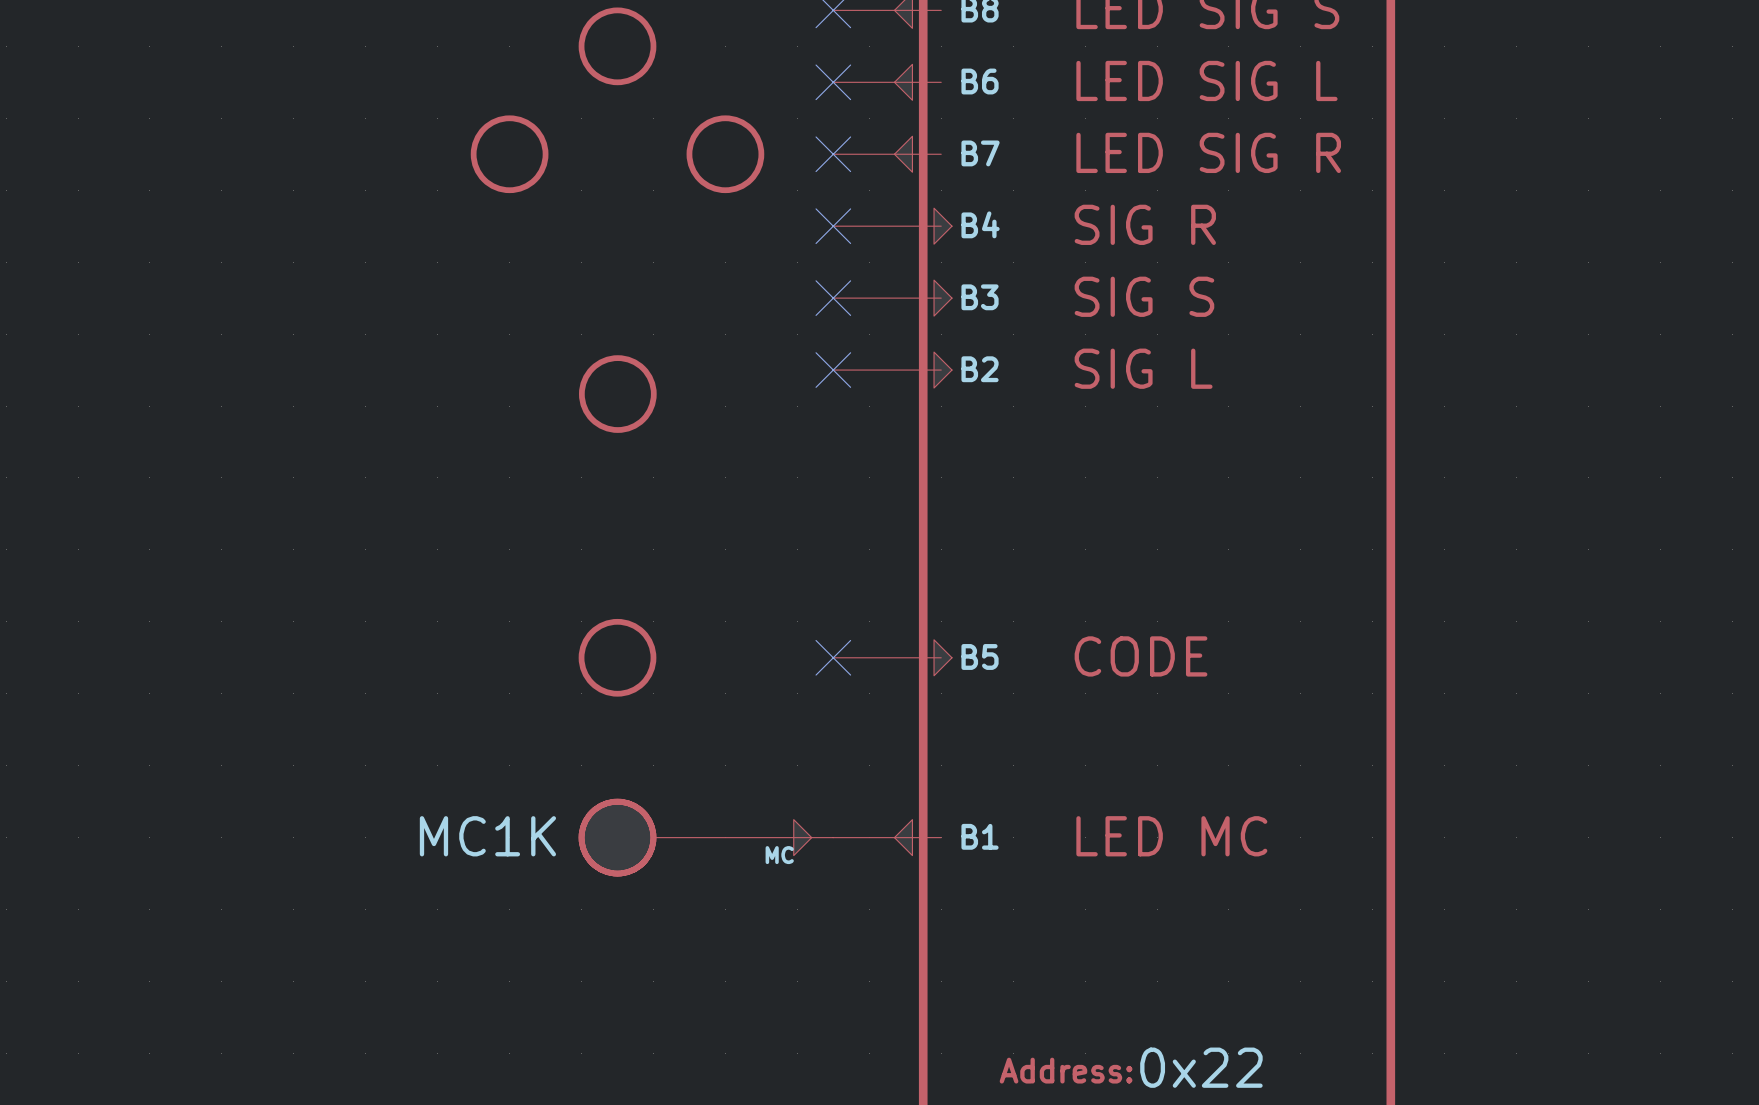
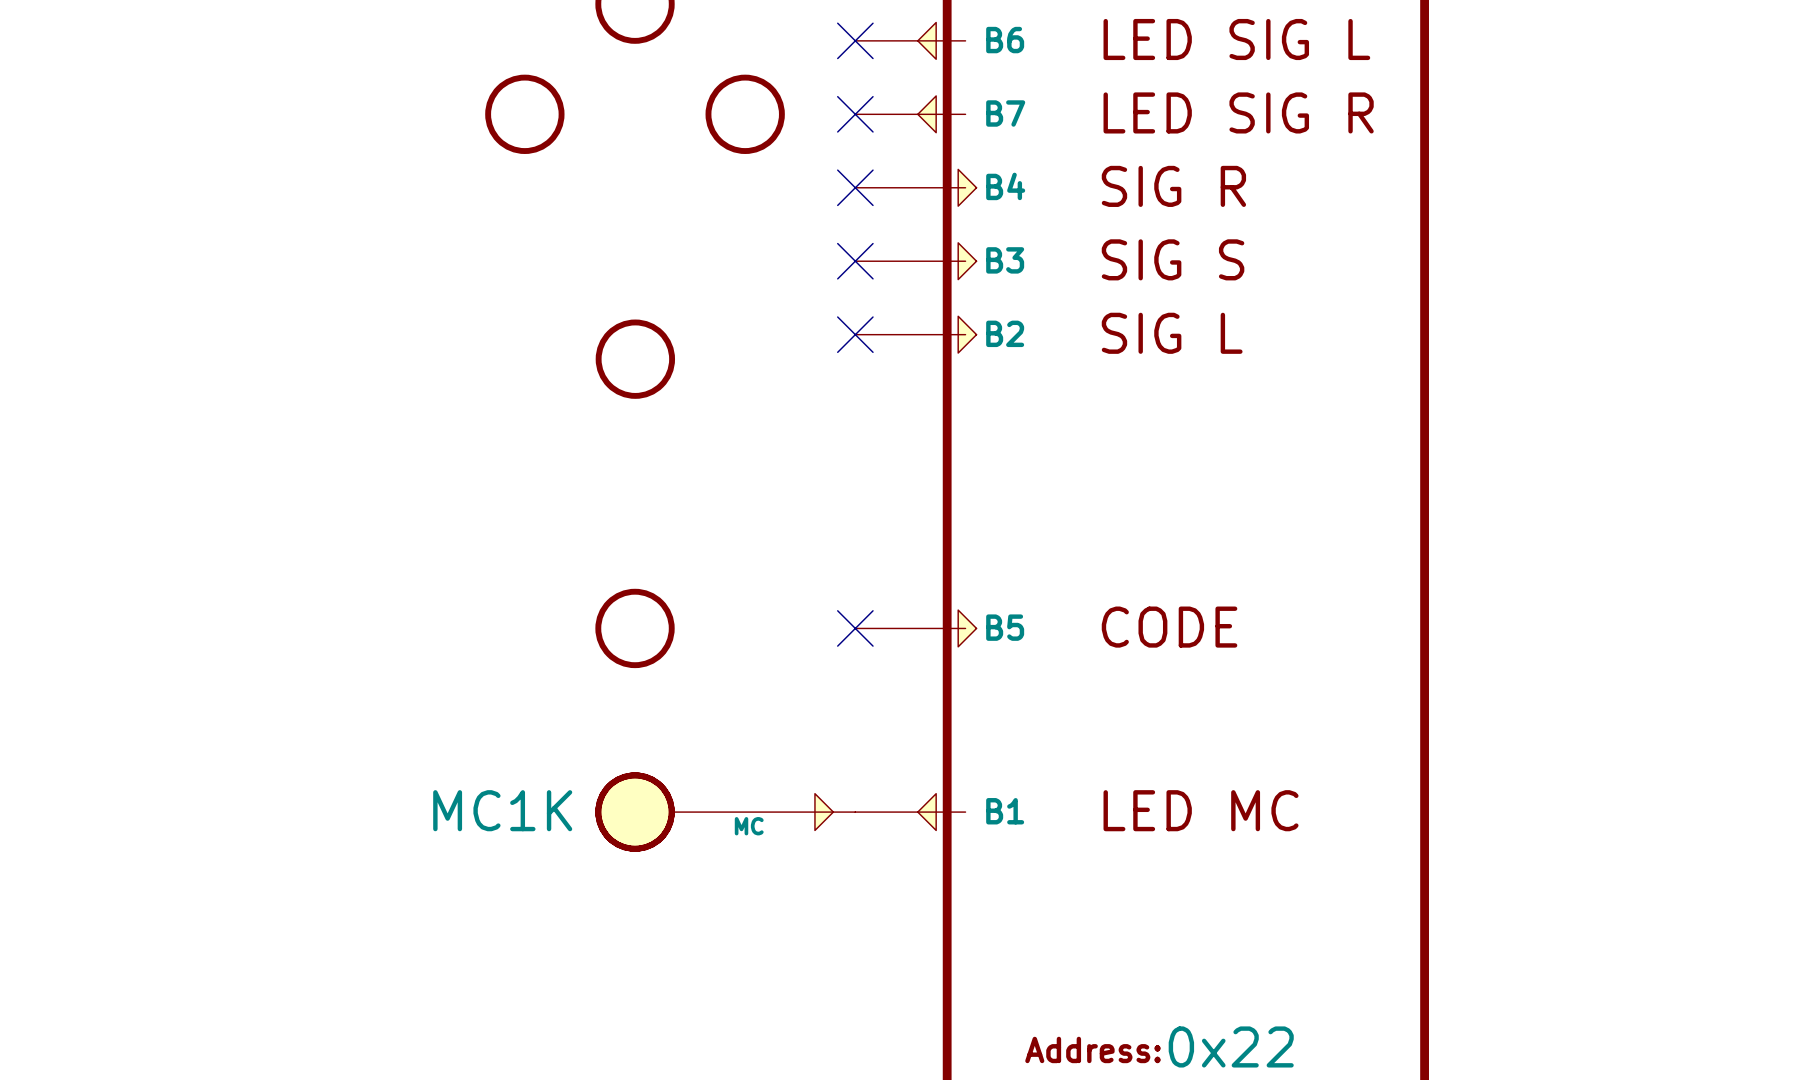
part value position: MC (779, 855) -> MC (749, 826)

